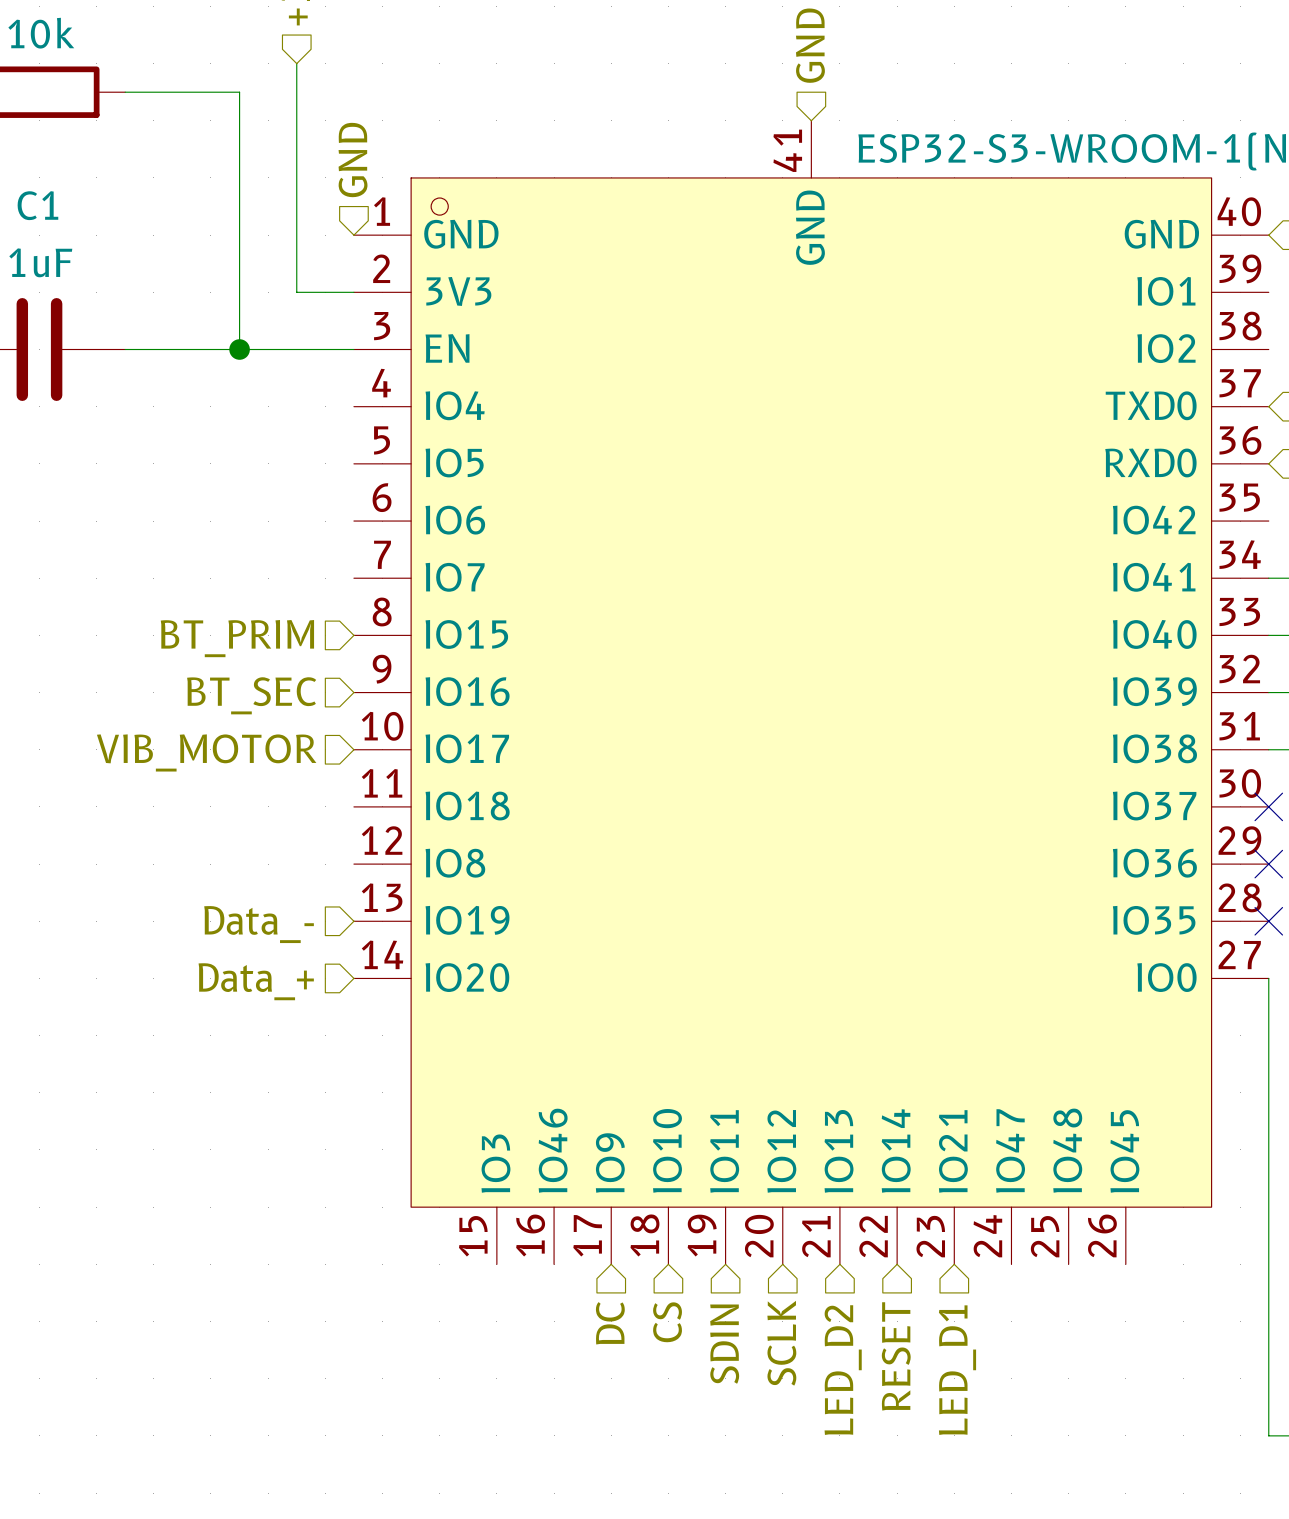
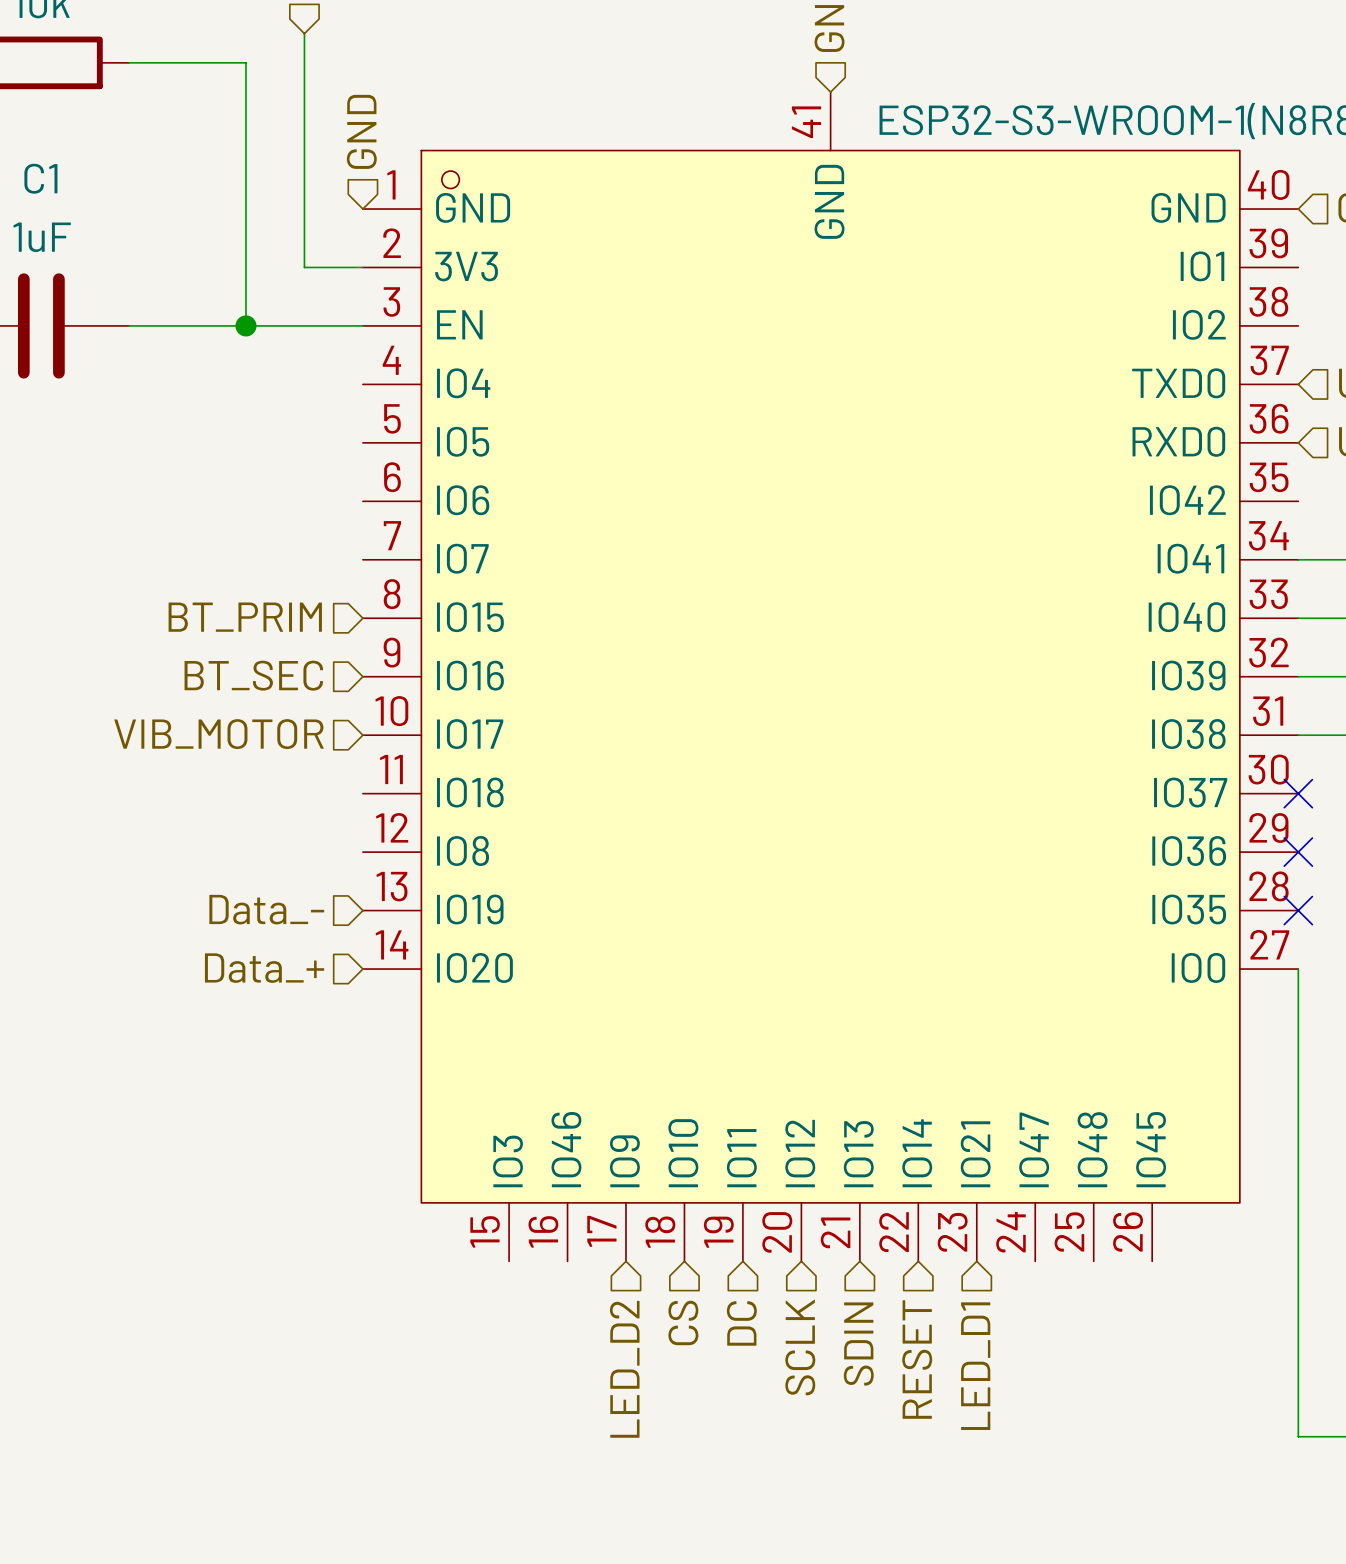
hierarchical label: DC (610, 1323) -> LED_D2 (624, 1369)
hierarchical label: SDIN (724, 1344) -> DC (741, 1323)
hierarchical label: LED_D2 (843, 1370) -> SDIN (858, 1343)

